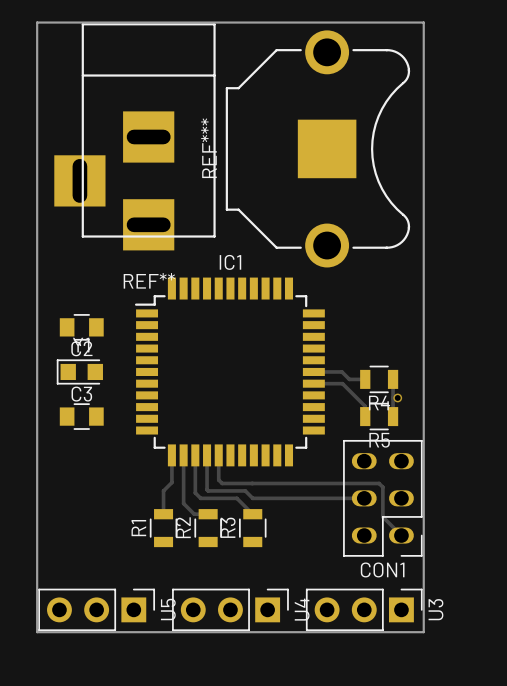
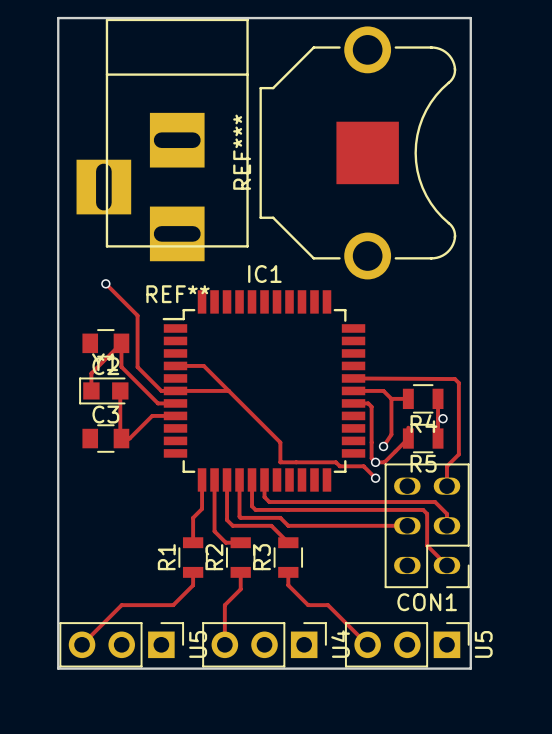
track: none -> (105, 283) (137, 315) (137, 367) (161, 390) (228, 390)
via: none -> (105, 283)
track: none -> (175, 365) (203, 365) (280, 442) (280, 462) (335, 462) (339, 466) (363, 466) (375, 478)
track: none -> (353, 378) (454, 379) (458, 383) (458, 454) (446, 466) (446, 486)
track: none -> (91, 390) (91, 373) (121, 343) (121, 366) (158, 403) (175, 403)
track: none -> (120, 390) (121, 438) (129, 438) (152, 415) (175, 415)
track: none -> (391, 398) (391, 434) (383, 446)
track: (327, 383) (342, 383) (365, 406) -> (368, 403) (371, 406) (371, 458) (375, 462) (384, 462) (408, 438)
via: none -> (383, 446)
via: none -> (375, 462)
via: none -> (375, 478)
track: none -> (264, 479) (264, 497) (269, 502) (435, 502) (446, 513) (446, 525)
track: none -> (193, 572) (193, 585) (173, 605) (121, 605) (82, 644)
track: none -> (240, 572) (240, 589) (224, 605) (224, 644)
track: none -> (288, 572) (288, 585) (308, 605) (327, 605) (367, 644)
U3 name: U3 (435, 609) -> U5 (483, 644)

